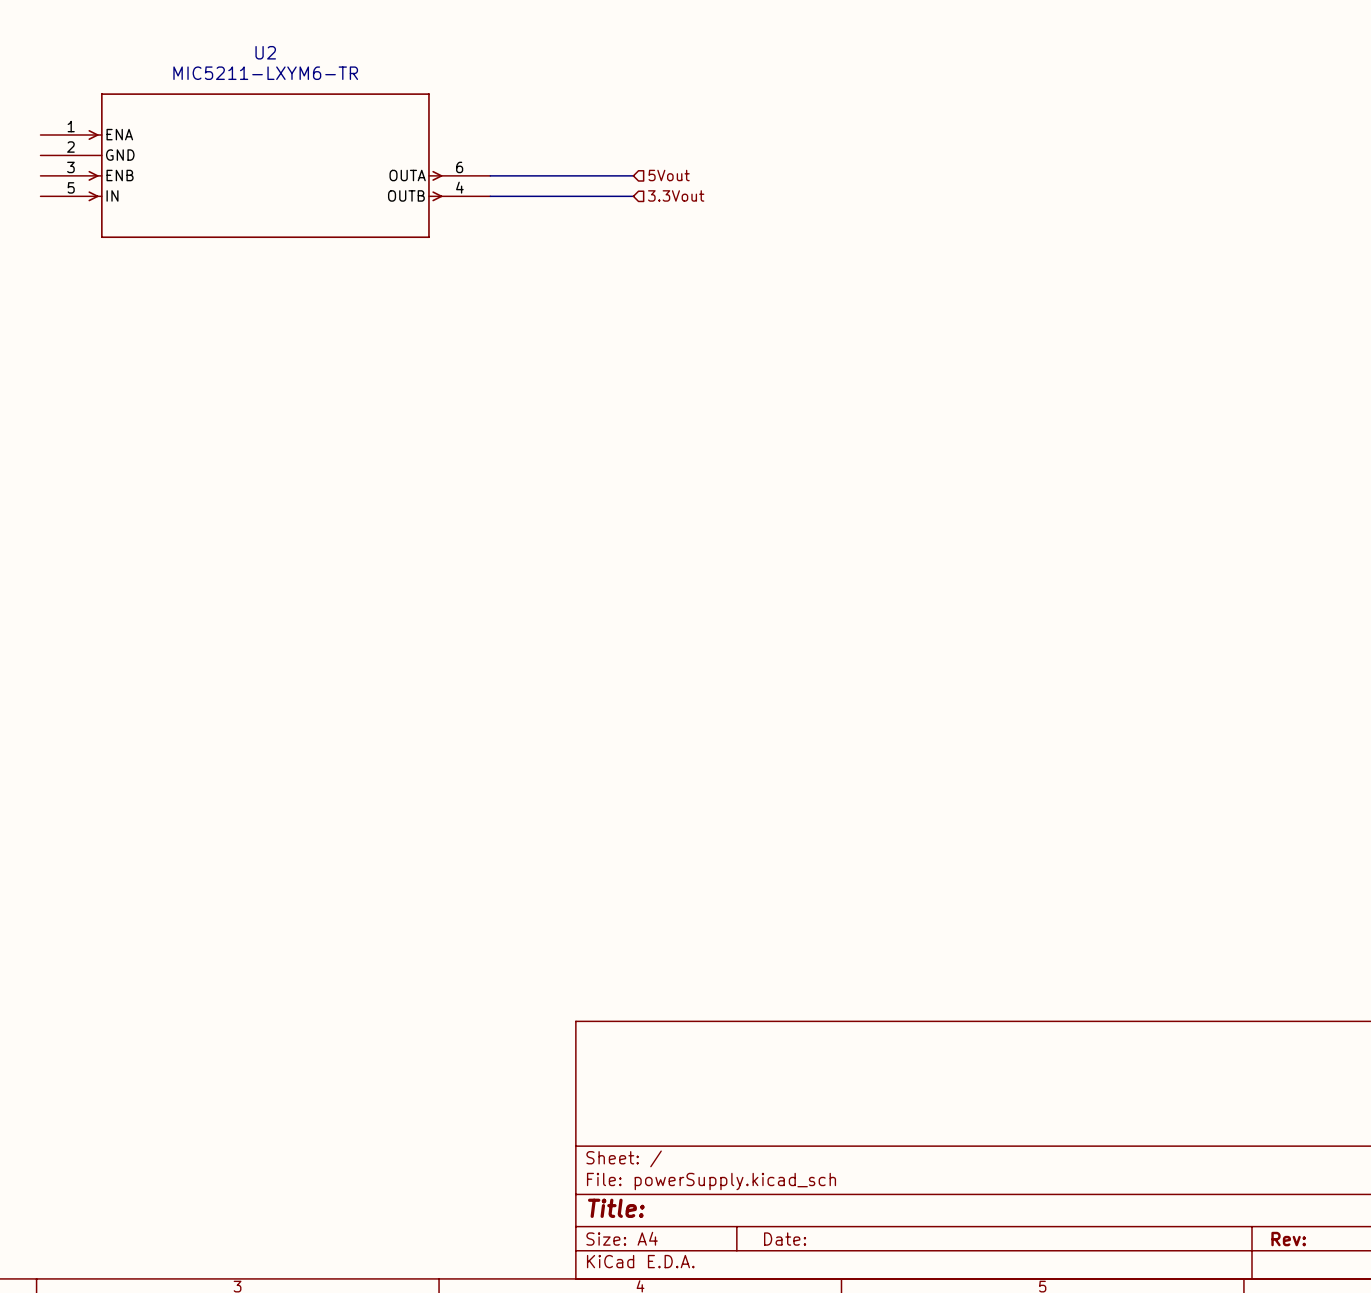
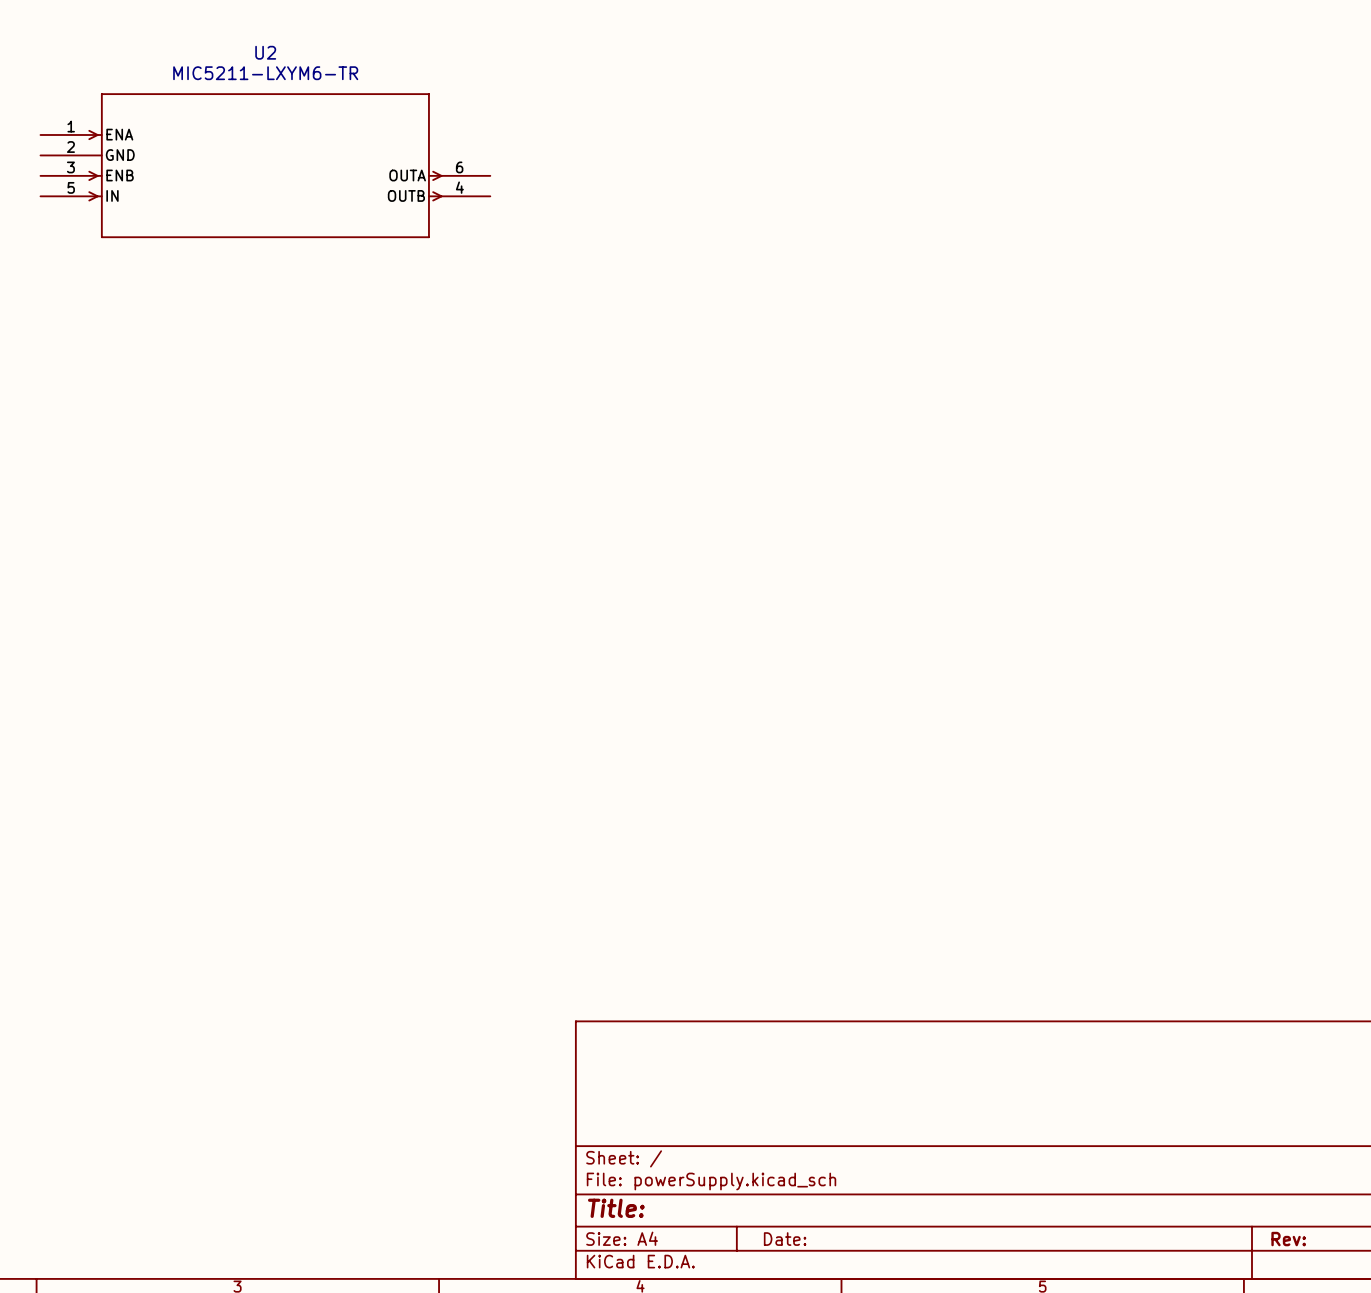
wire: (490, 175) (633, 175) -> none
hierarchical label: 5Vout (669, 175) -> none
hierarchical label: 3.3Vout (676, 195) -> none
wire: (490, 196) (633, 196) -> none

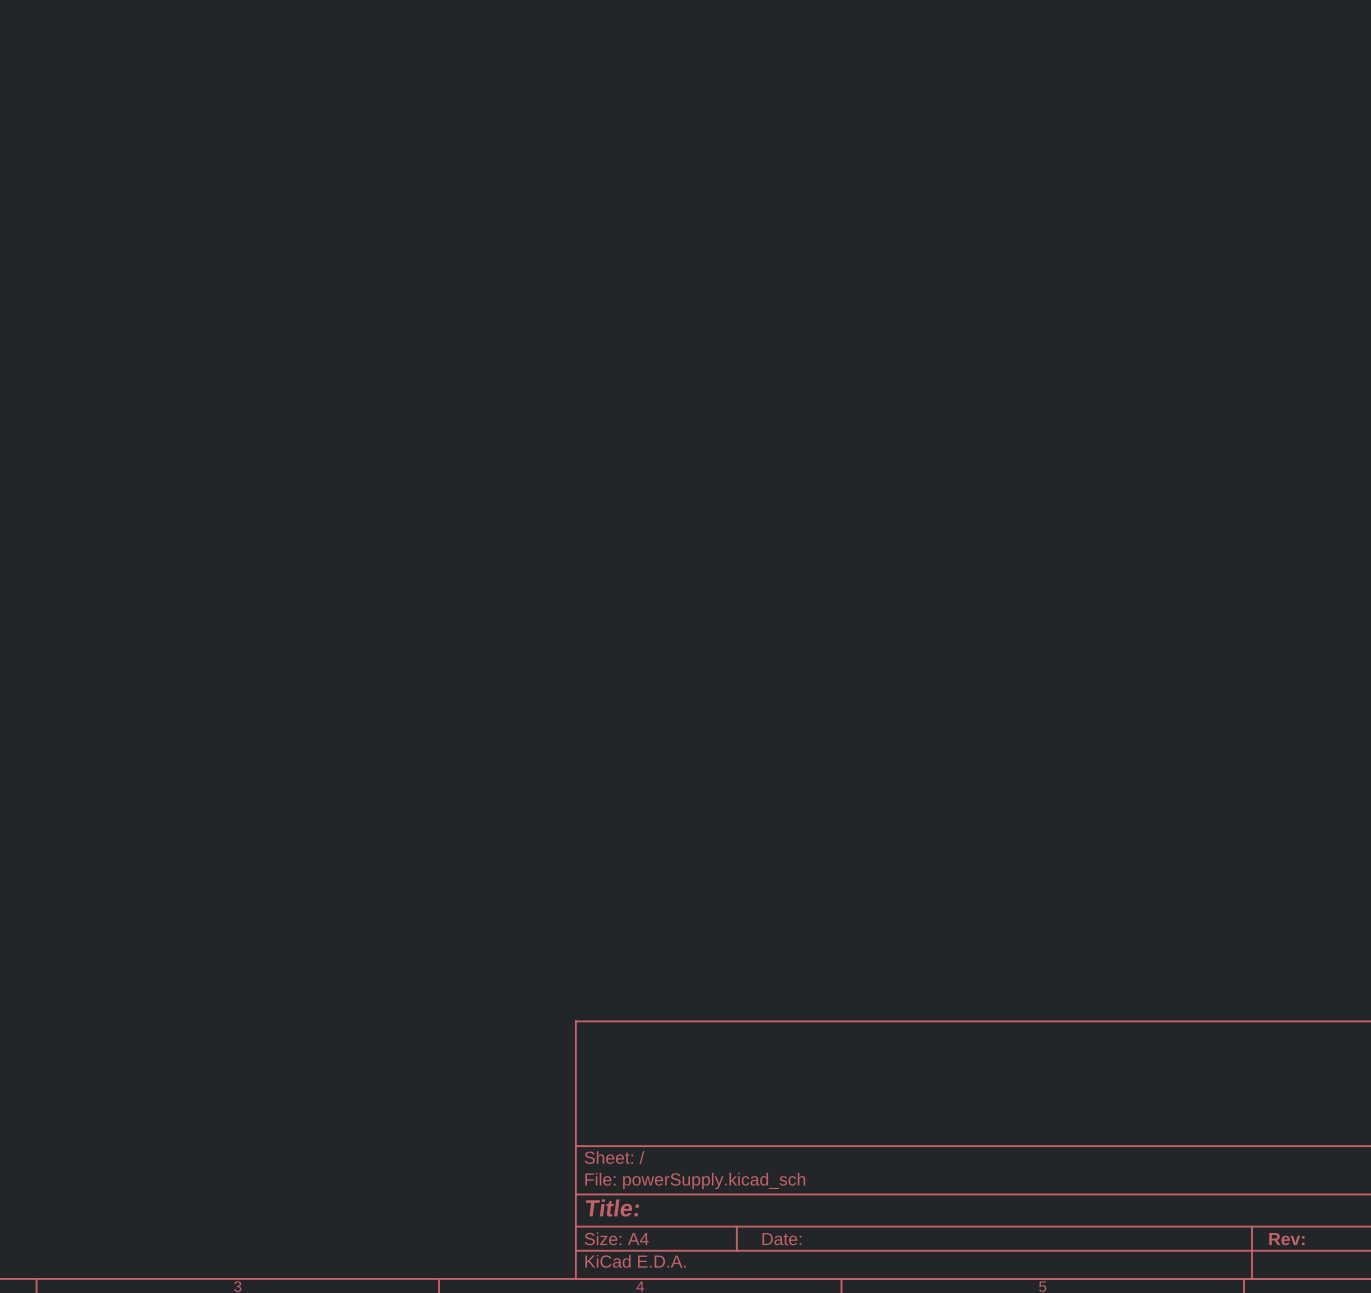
U2: MIC5211-LXYM6-TR (265, 165) -> none

